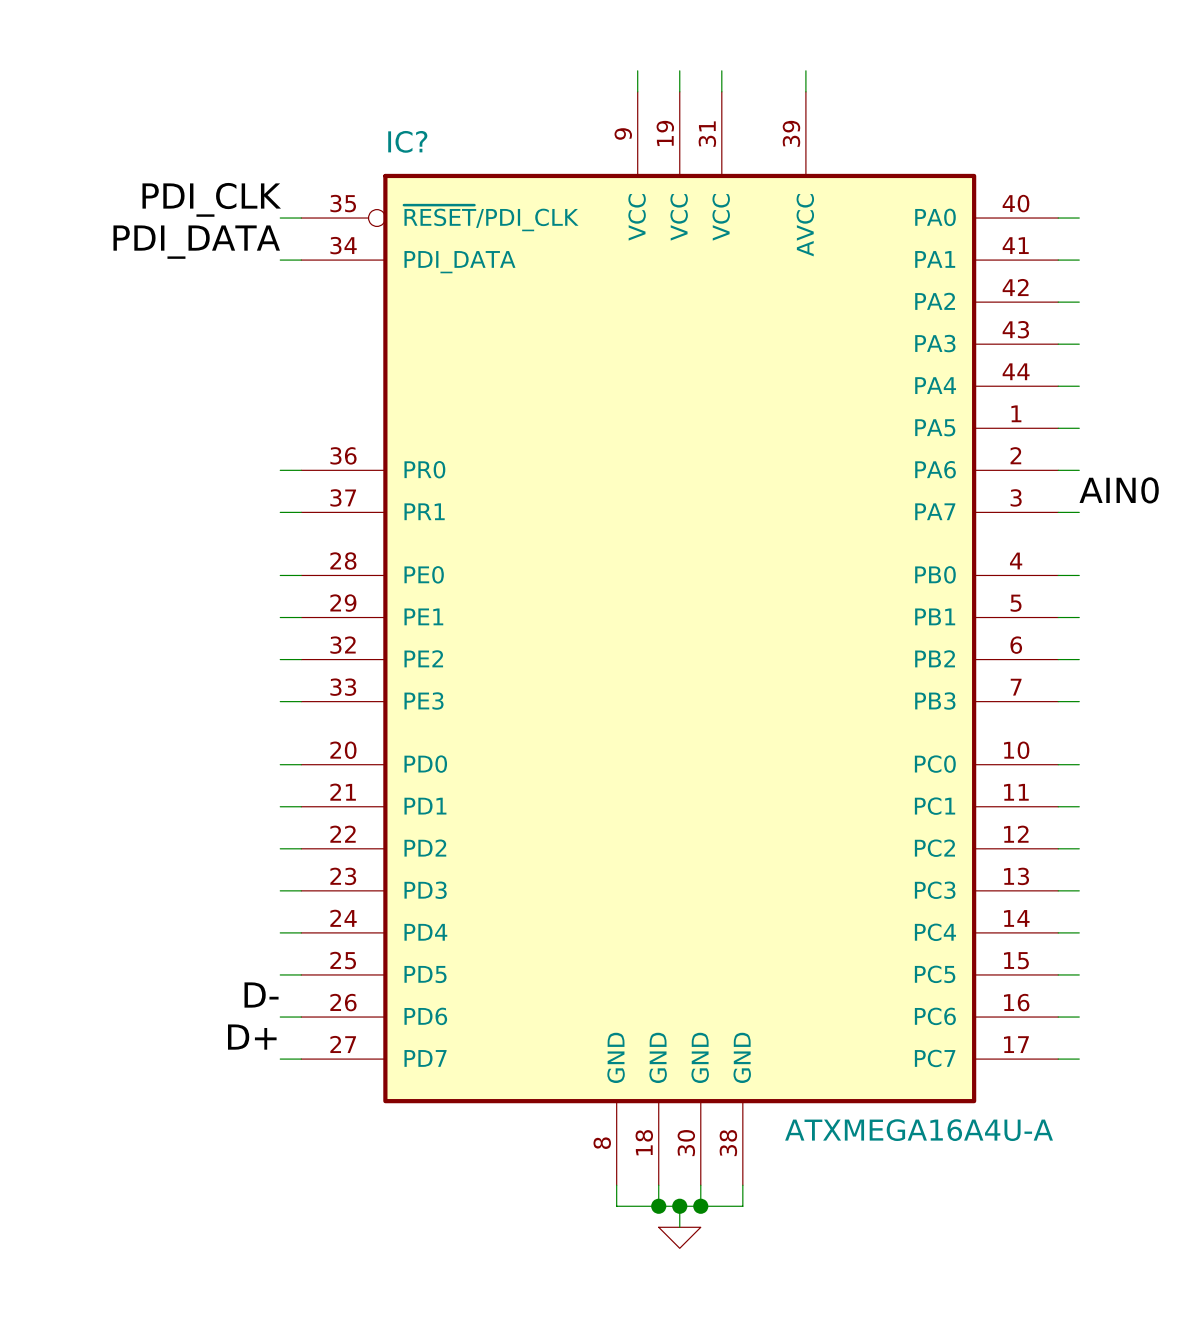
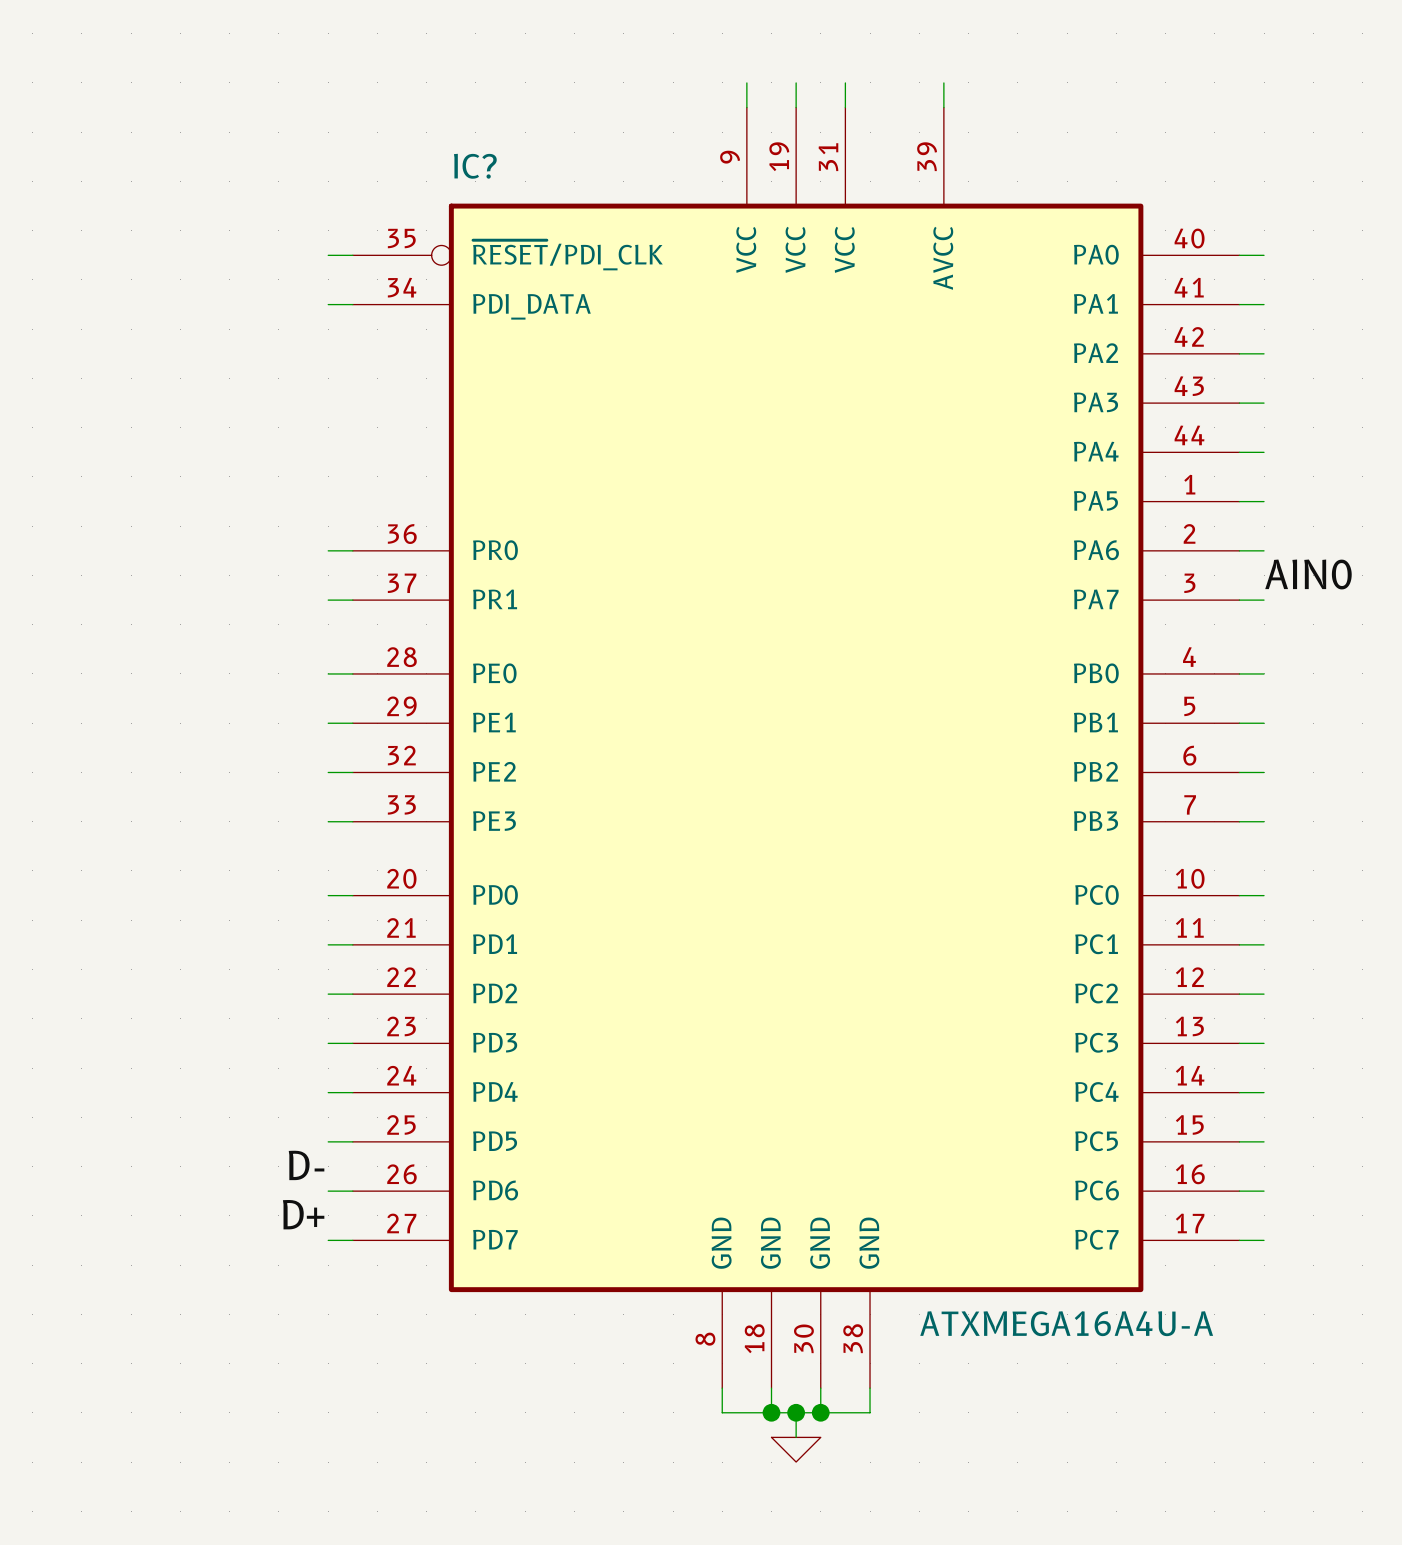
label: PDI_CLK (211, 199) -> none
label: PDI_DATA (196, 242) -> none

